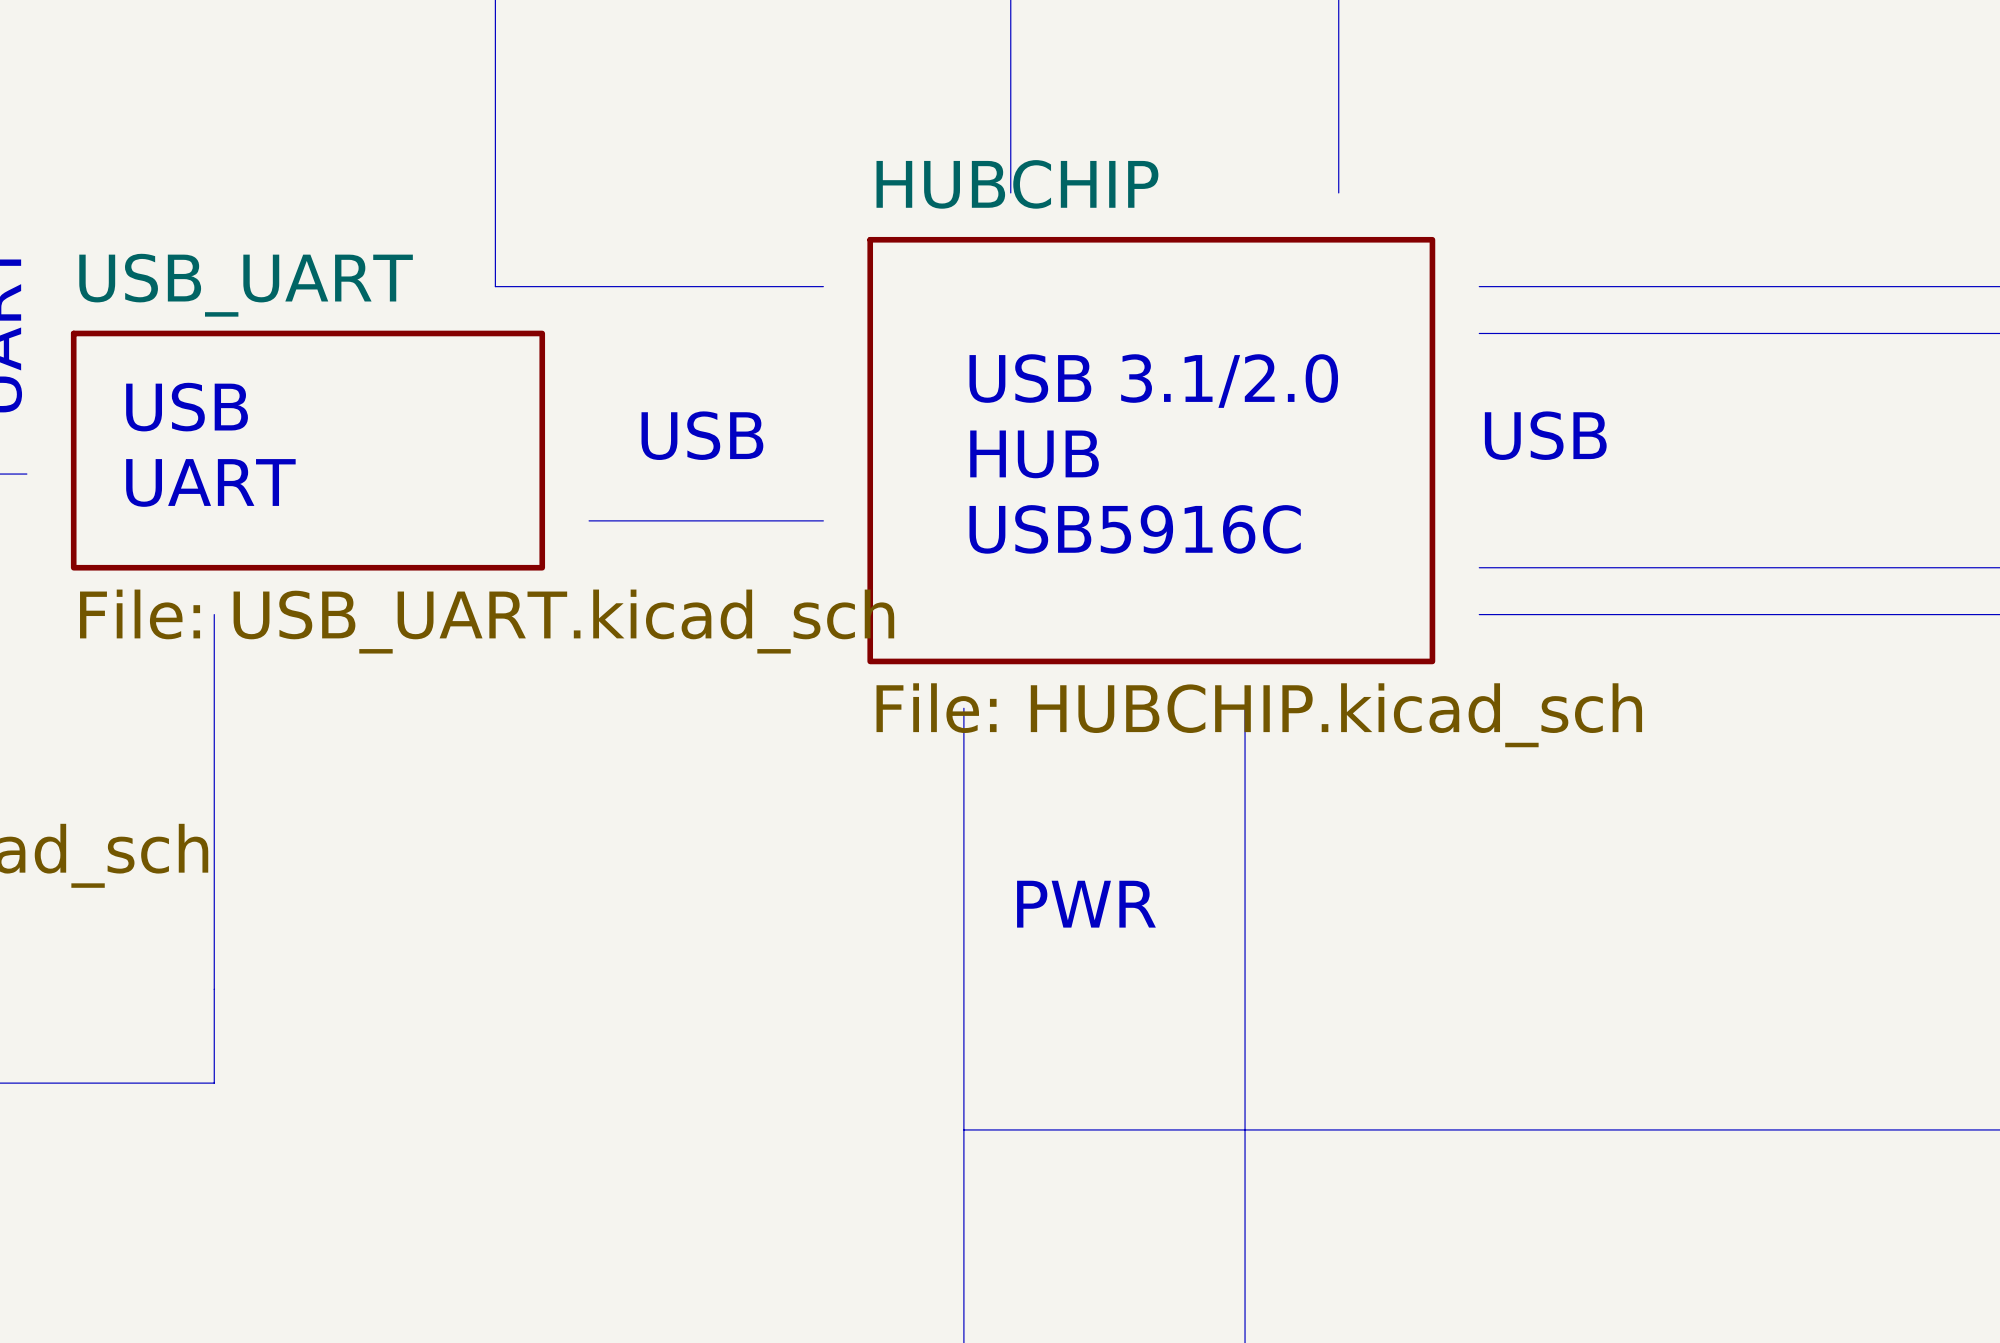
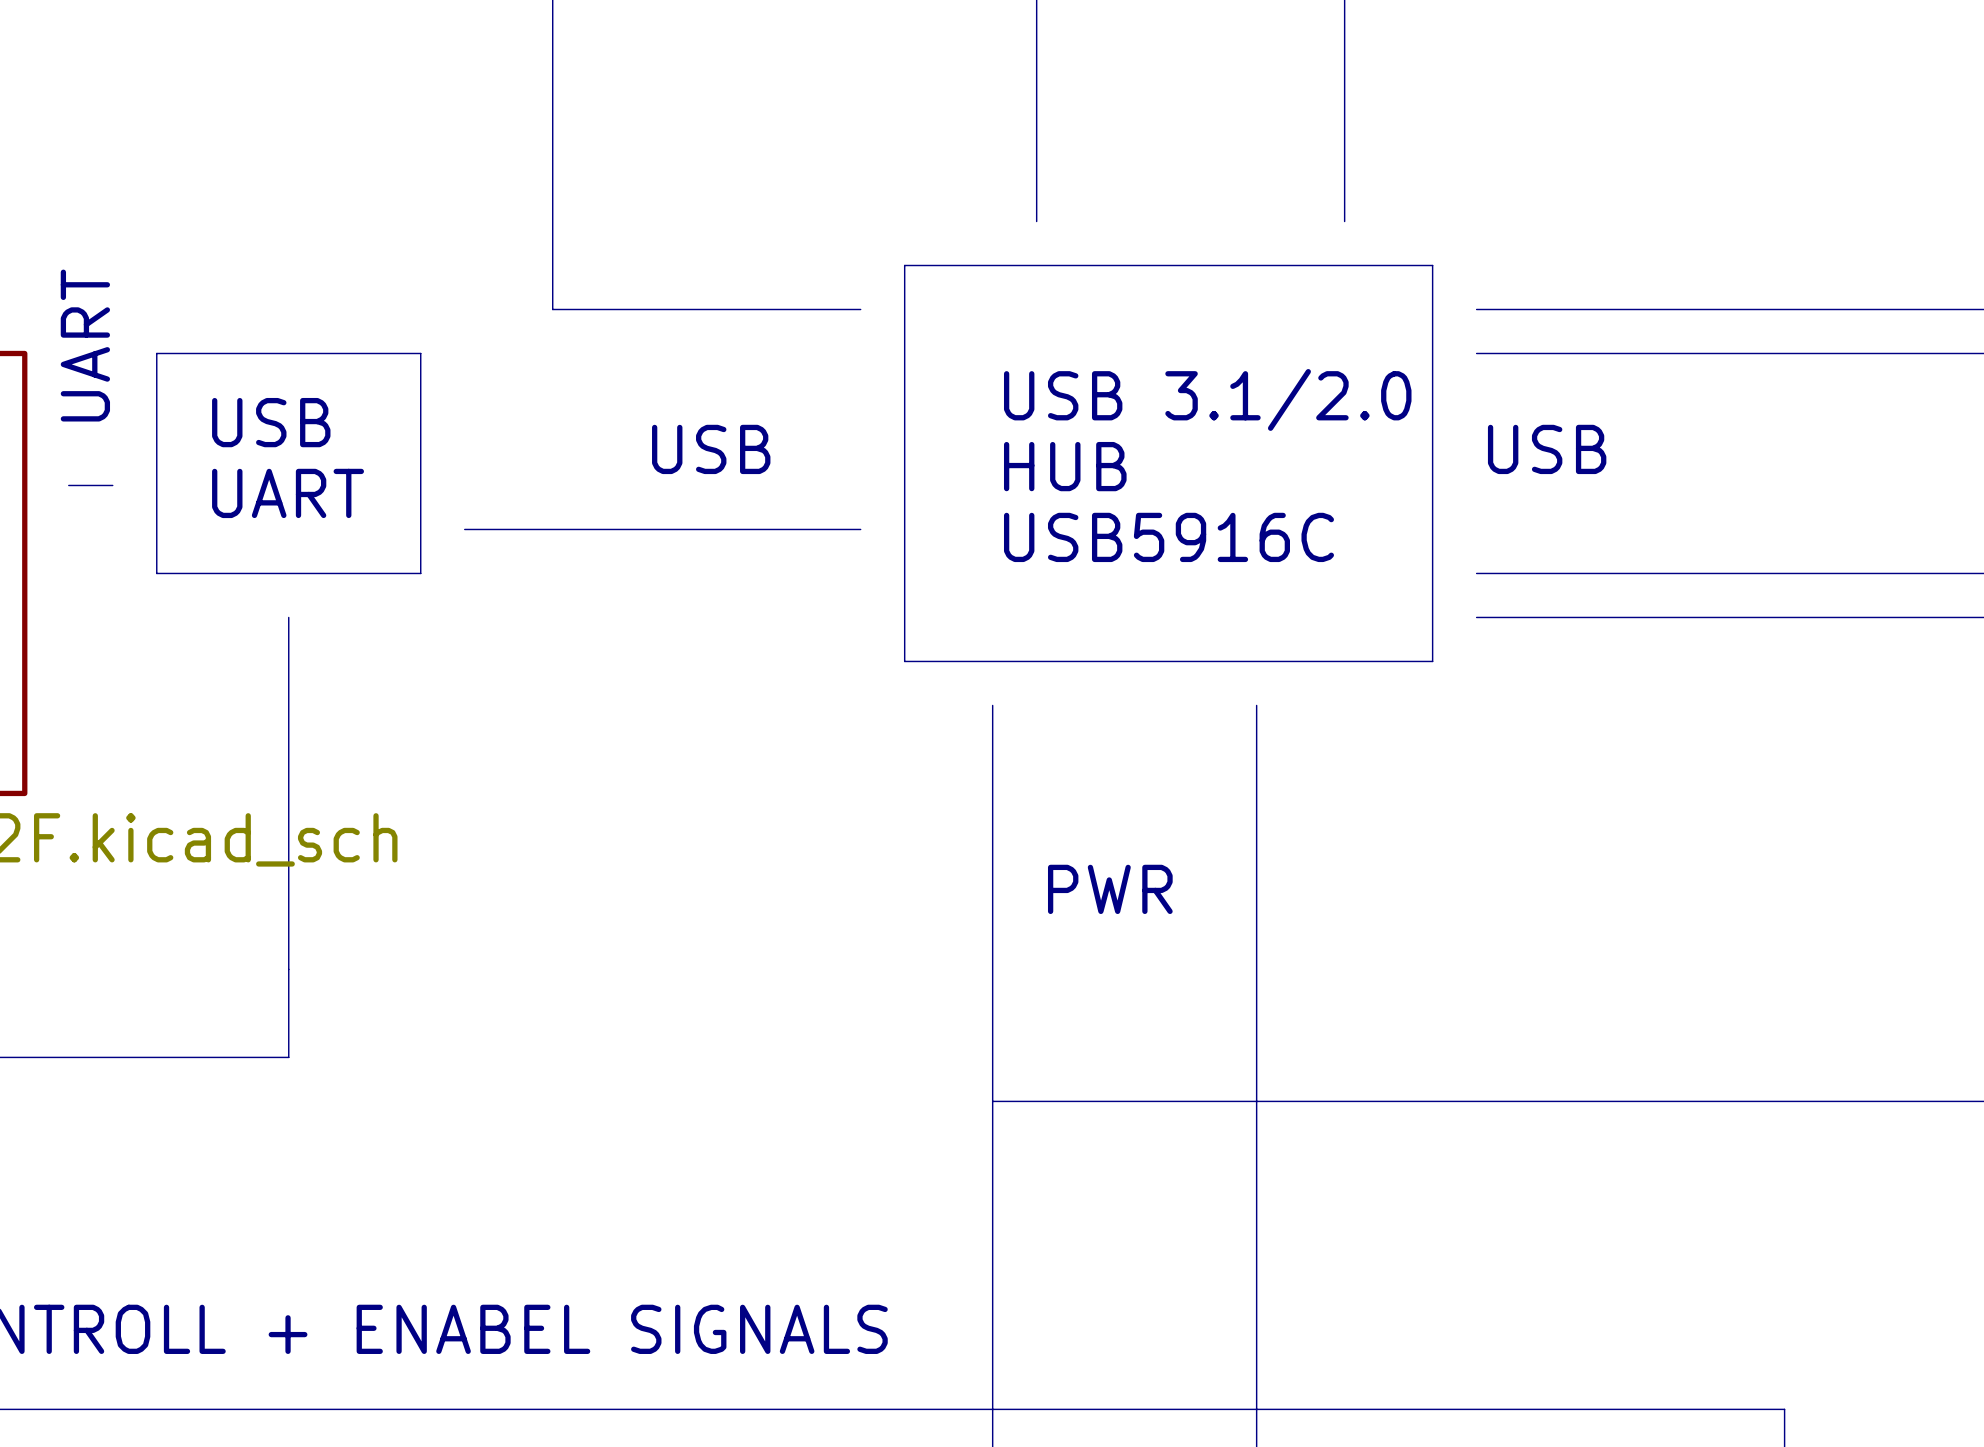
line: none -> (904, 265) (1432, 265) (1432, 661) (904, 661) (904, 265)
line: none -> (156, 353) (420, 353) (420, 573) (156, 573) (156, 353)
text position: USB (702, 435) -> USB (711, 449)
sheet USB_UART: File: USB_UART.kicad_sch (307, 450) -> none
sheet HUBCHIP: File: HUBCHIP.kicad_sch (1151, 450) -> none
line: none -> (464, 529) (640, 529)

